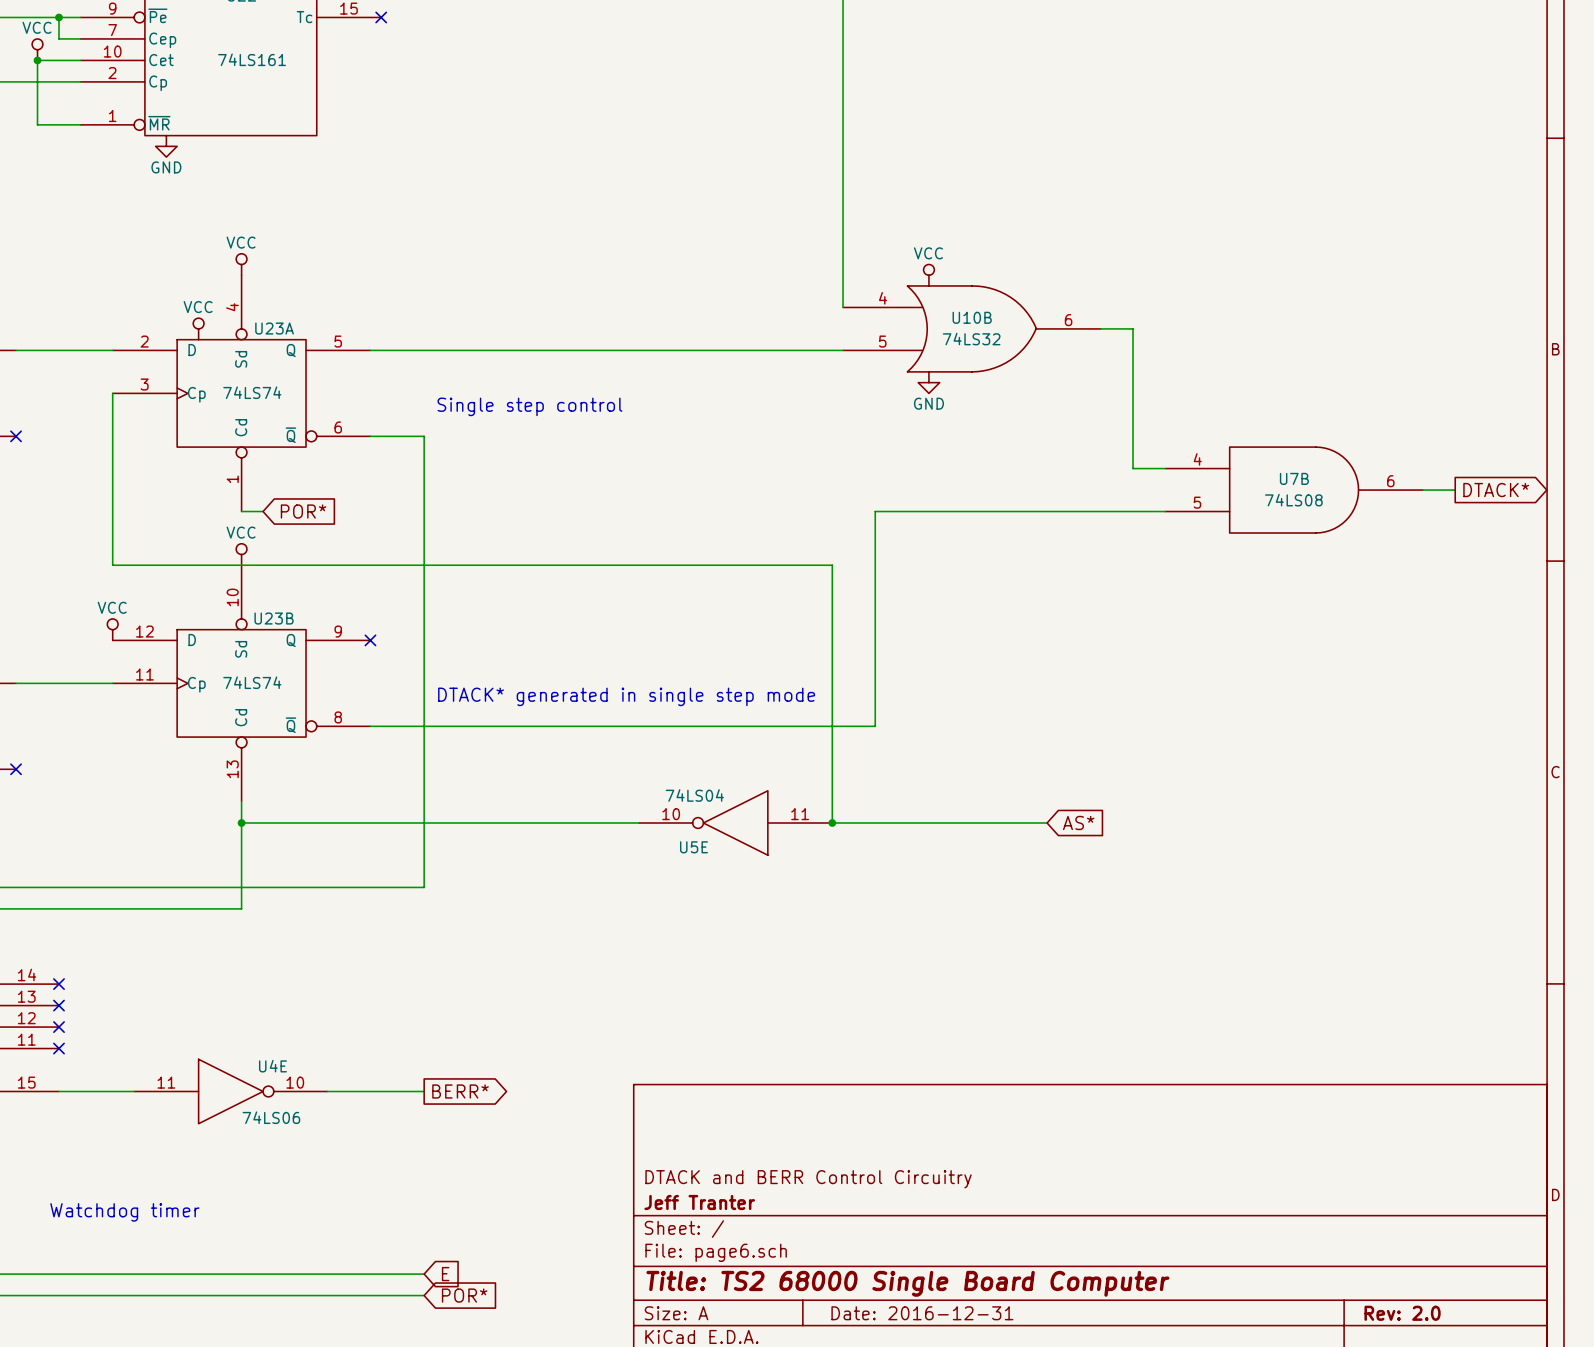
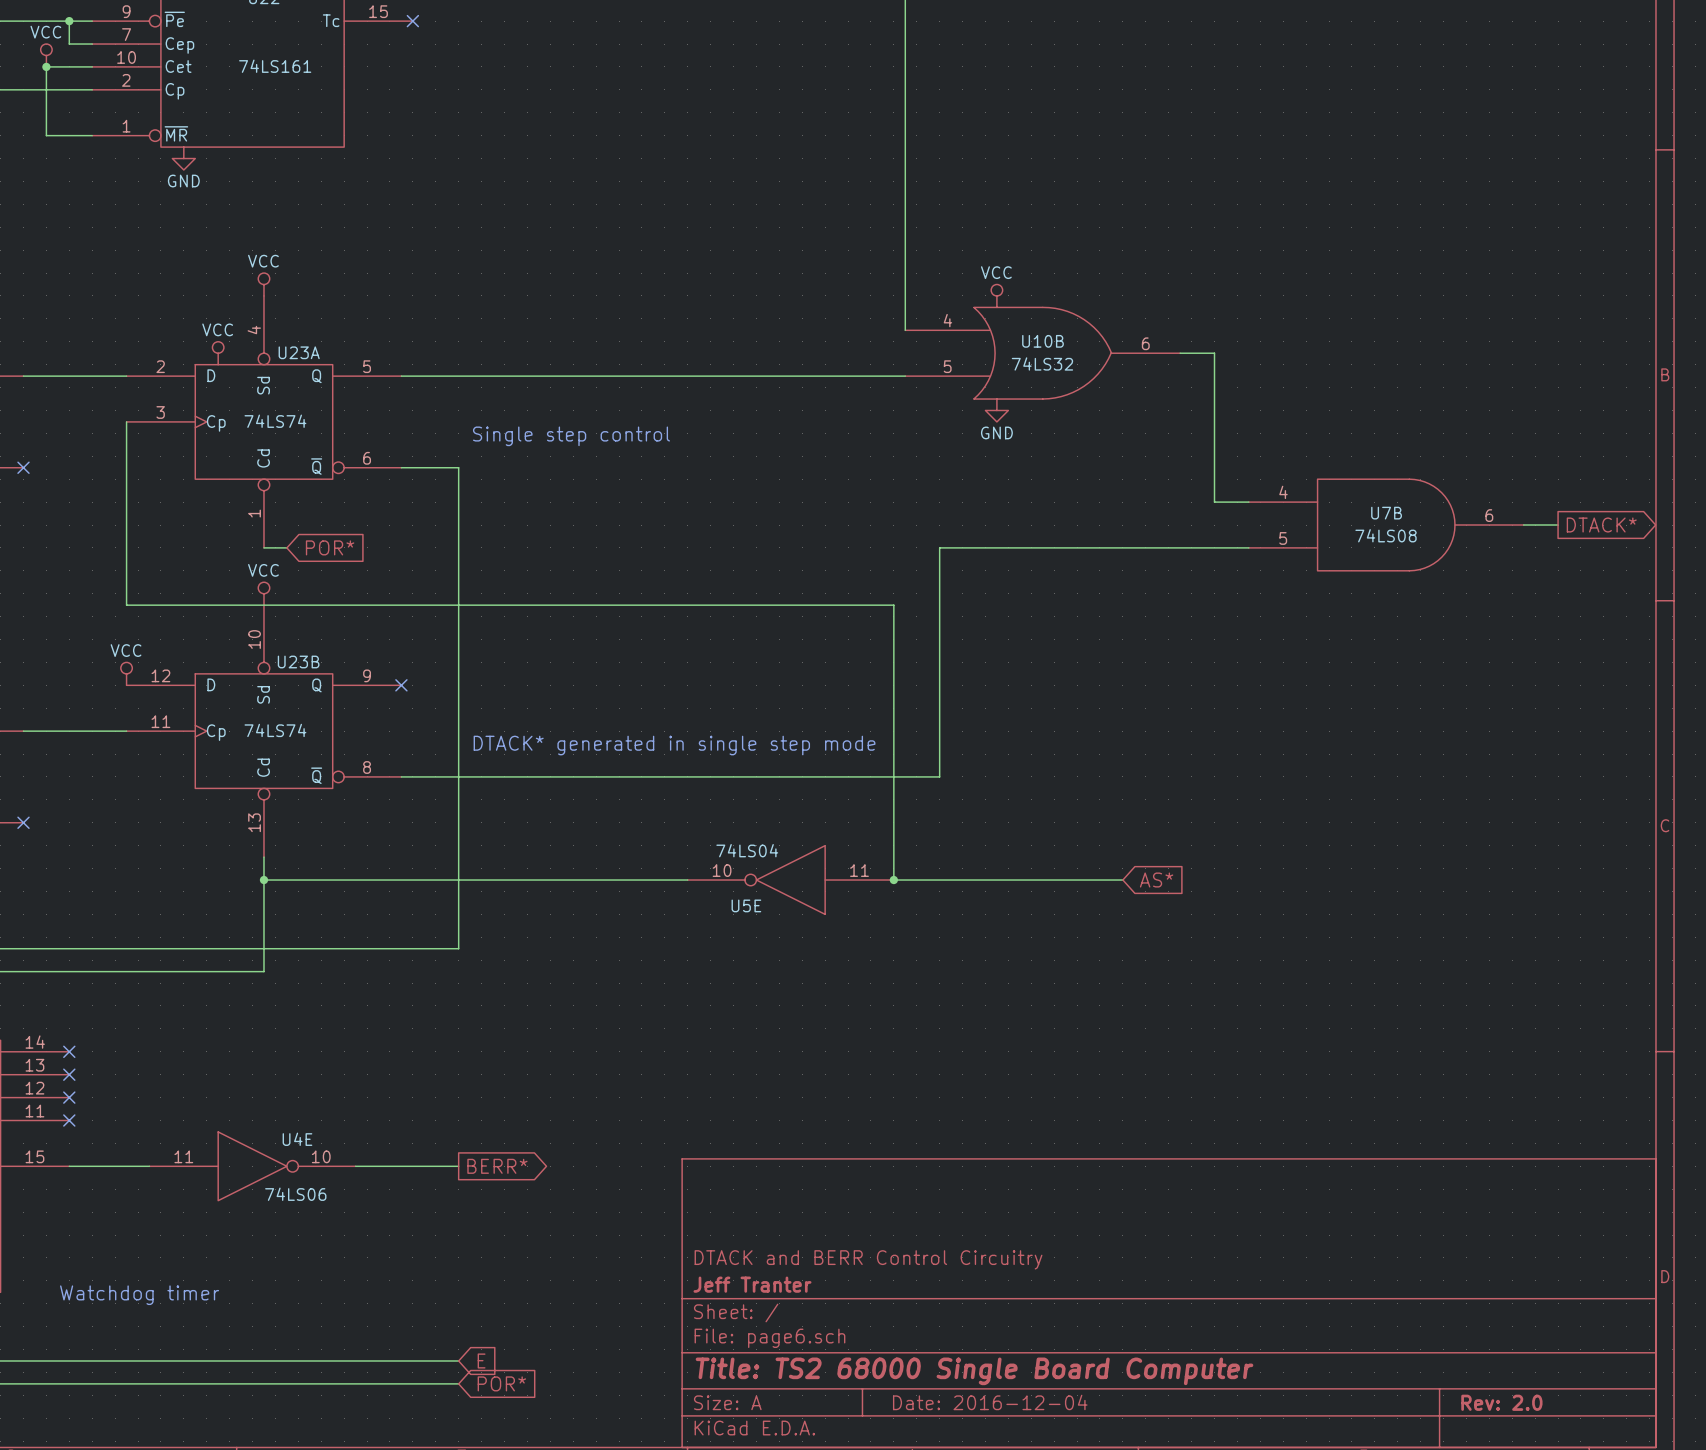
title block: Date: 2016-12-31 (922, 1313) -> Date: 2016-12-04 (990, 1402)

